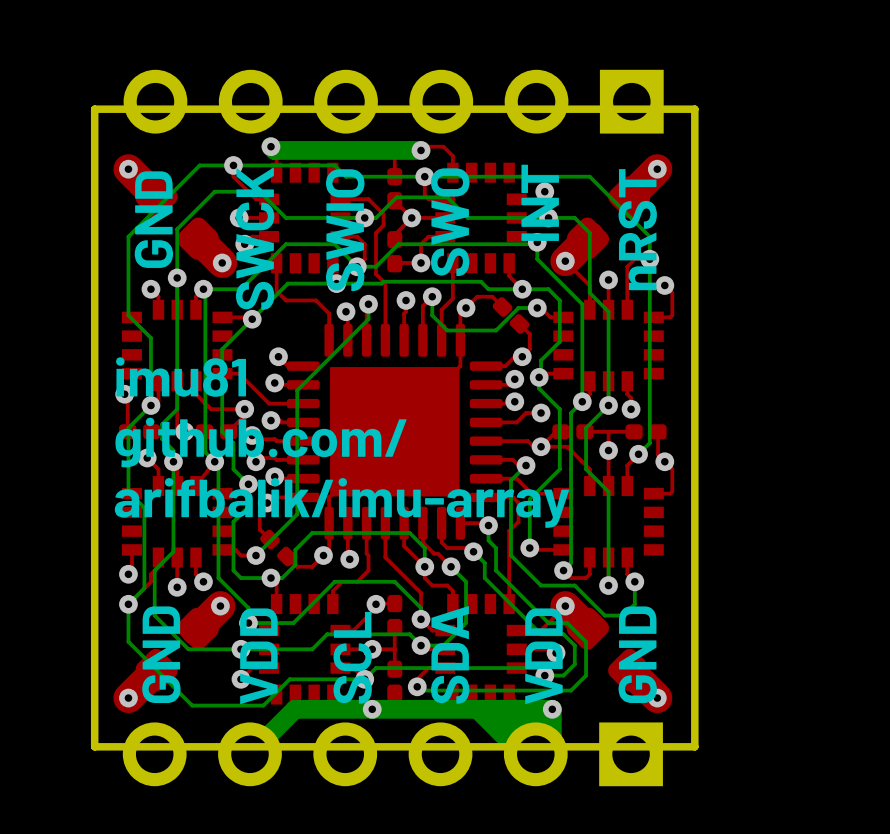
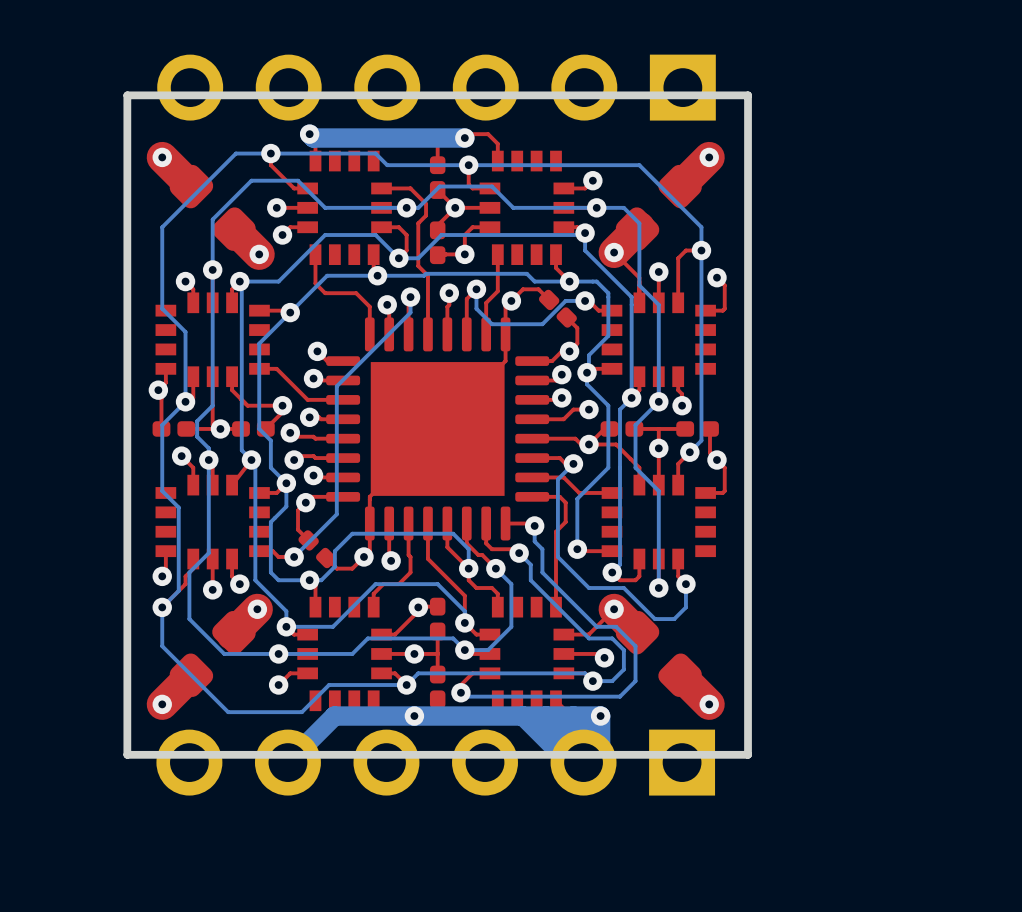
text: INT (540, 202) -> none
text: GND (153, 219) -> none
text: SWO (450, 222) -> none
text: nRST (637, 229) -> none
text: SWIO (345, 230) -> none
text: SWCK (255, 238) -> none
text: imu81 (181, 377) -> none
text: github.com/ (261, 442) -> none
text: arifbalik/imu-array (342, 502) -> none
text: GND (161, 654) -> none
text: SDA (450, 654) -> none
text: GND (637, 654) -> none
text: VDD (258, 656) -> none
text: VDD (543, 656) -> none
text: SCL (352, 657) -> none

